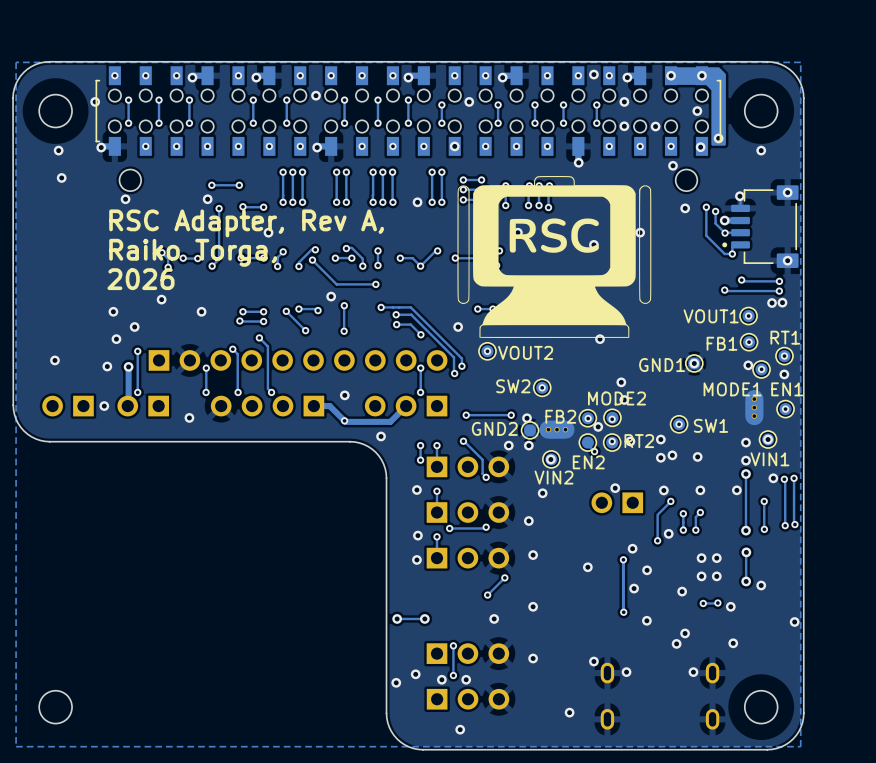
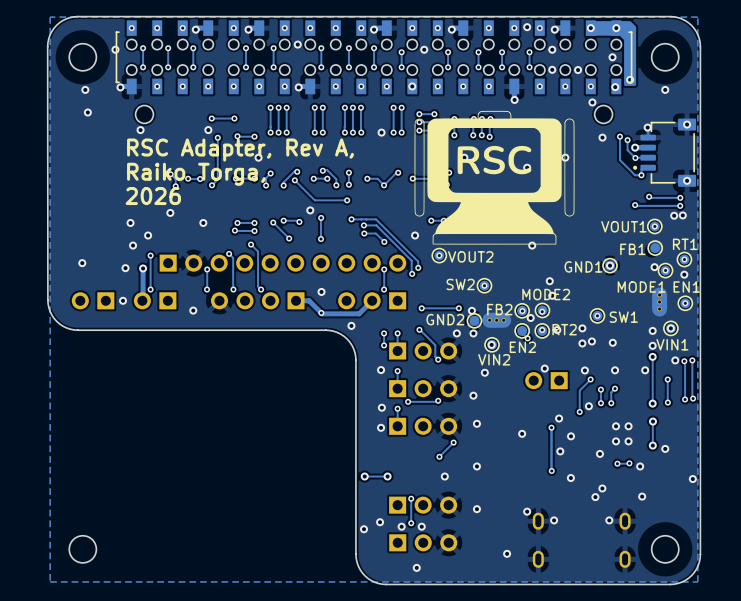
via: (749, 342) -> none

